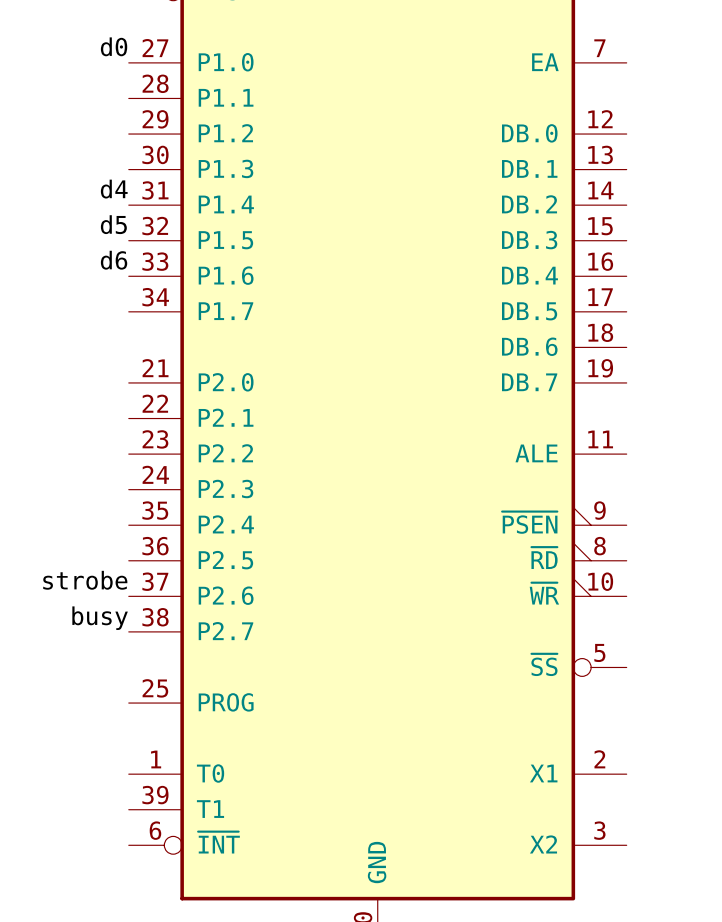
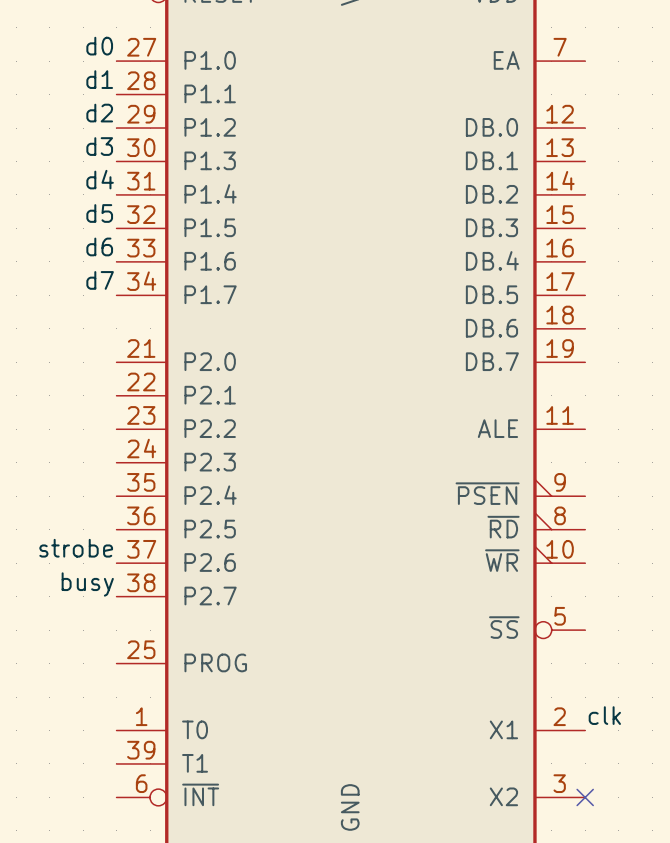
label: none -> d1 (99, 79)
label: none -> d2 (99, 113)
label: none -> d3 (99, 146)
label: none -> d7 (100, 280)
label: none -> clk (604, 715)
no-connect mark: none -> (585, 797)

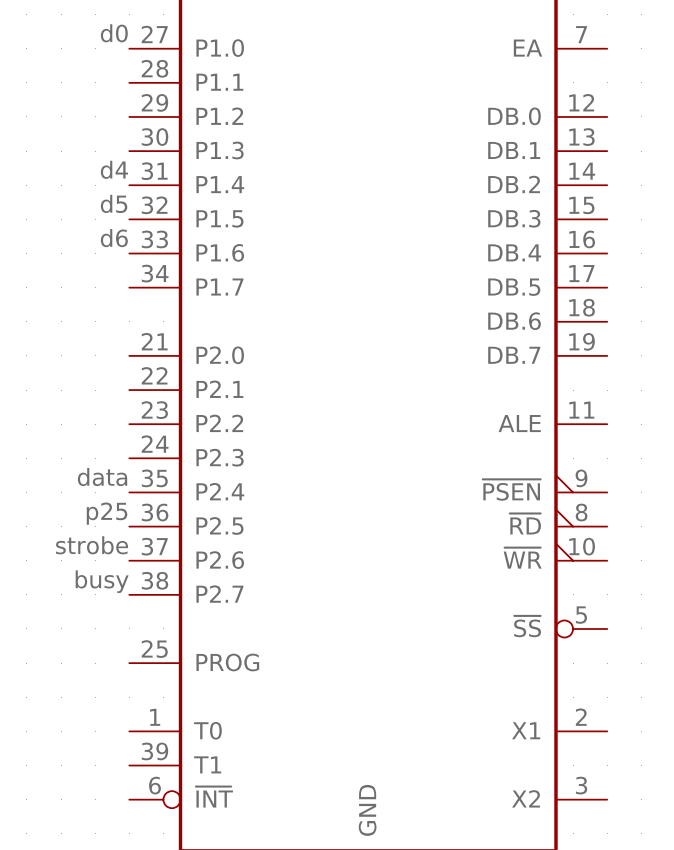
label: d1 (99, 79) -> none
label: d2 (99, 113) -> none
label: d3 (99, 146) -> none
label: d7 (100, 280) -> none
label: none -> data (102, 477)
label: none -> p25 (107, 513)
label: clk (604, 715) -> none
no-connect mark: (585, 797) -> none

